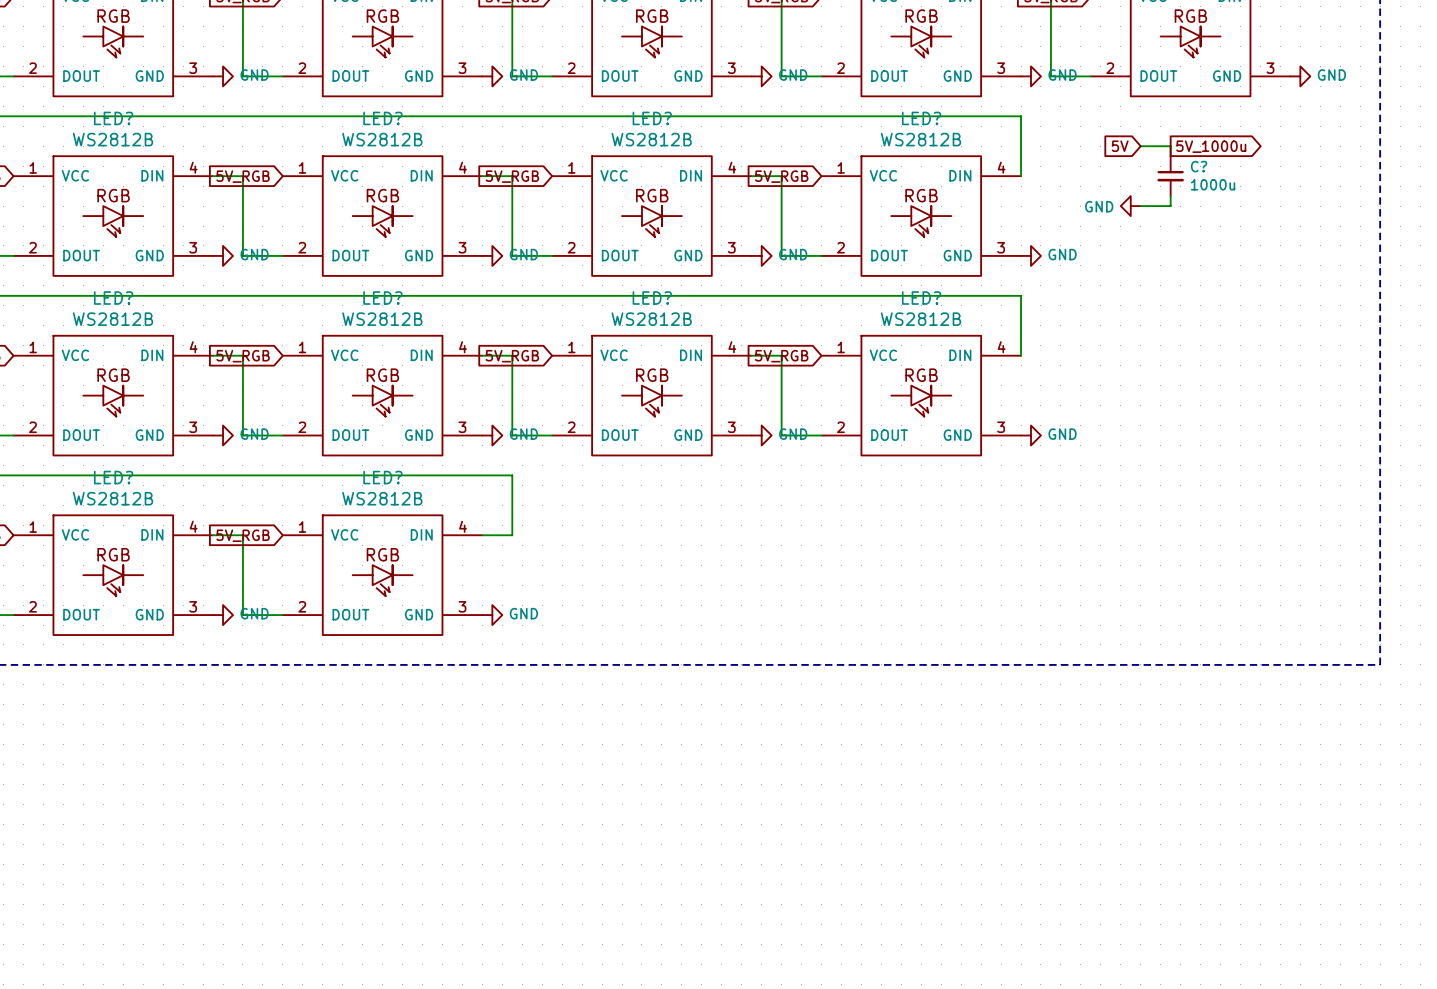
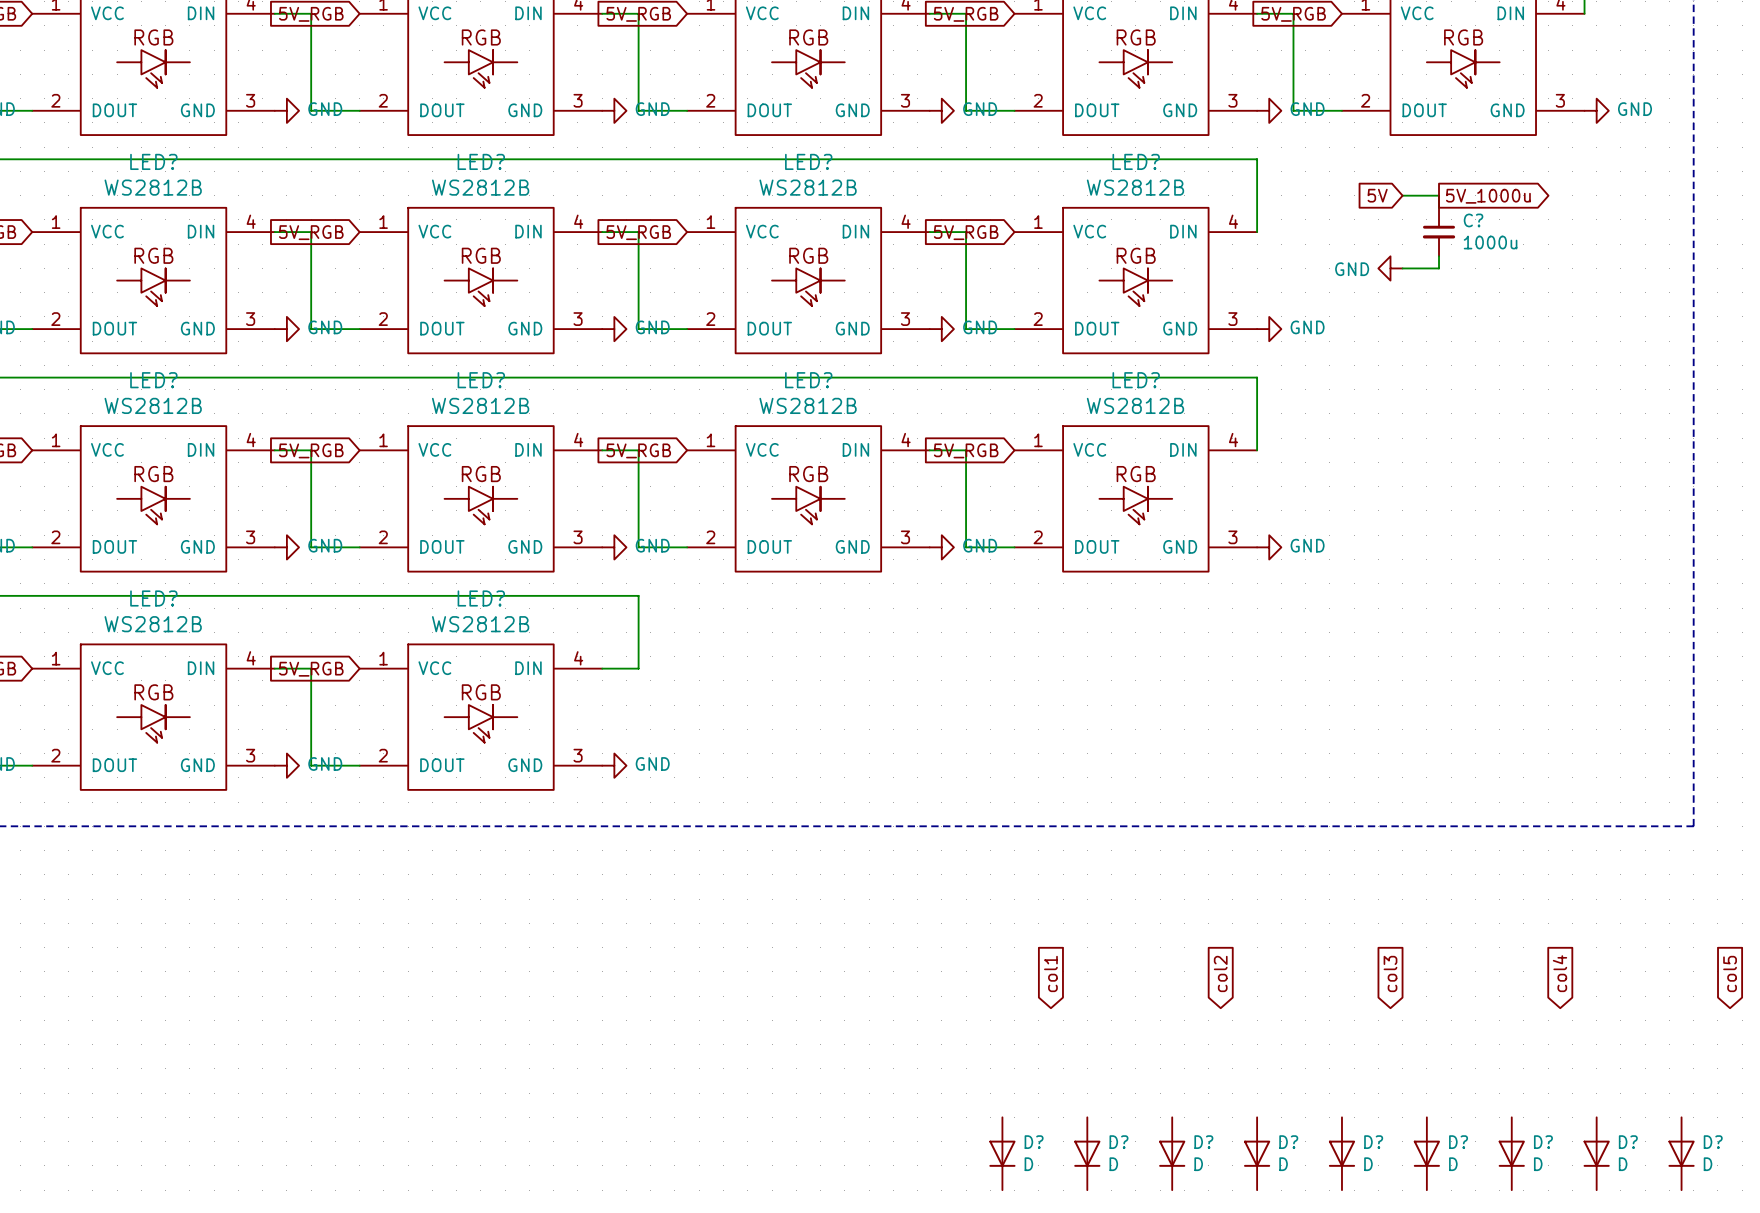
global label: none -> col1 (1050, 973)
global label: none -> col2 (1220, 973)
global label: none -> col3 (1390, 973)
global label: none -> col4 (1559, 973)
global label: none -> col5 (1730, 973)
D?: none -> D (1002, 1153)
D?: none -> D (1087, 1153)
D?: none -> D (1172, 1153)
D?: none -> D (1257, 1153)
D?: none -> D (1341, 1153)
D?: none -> D (1426, 1153)
D?: none -> D (1511, 1153)
D?: none -> D (1596, 1153)
D?: none -> D (1681, 1153)

